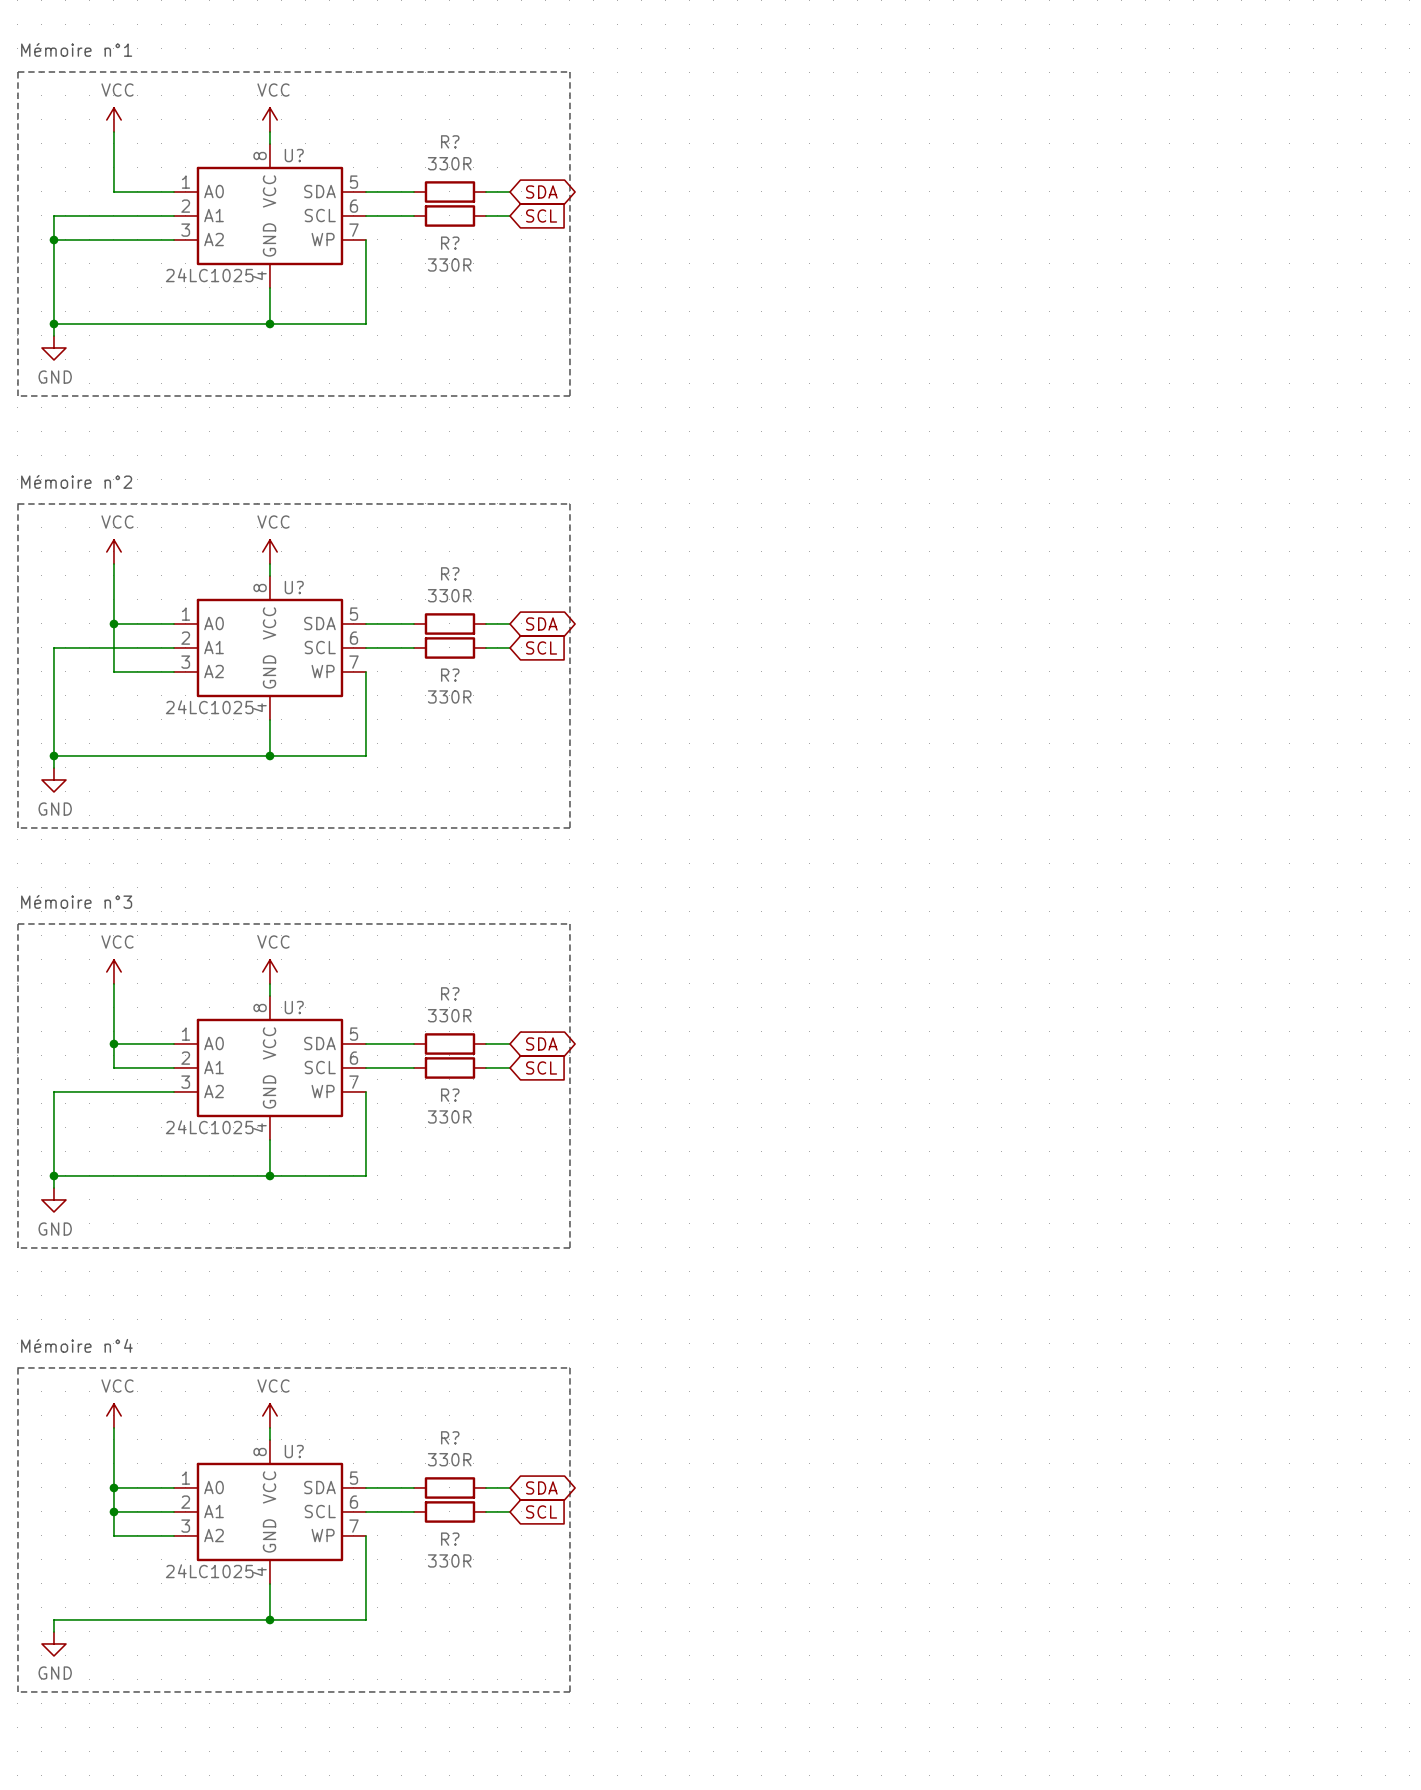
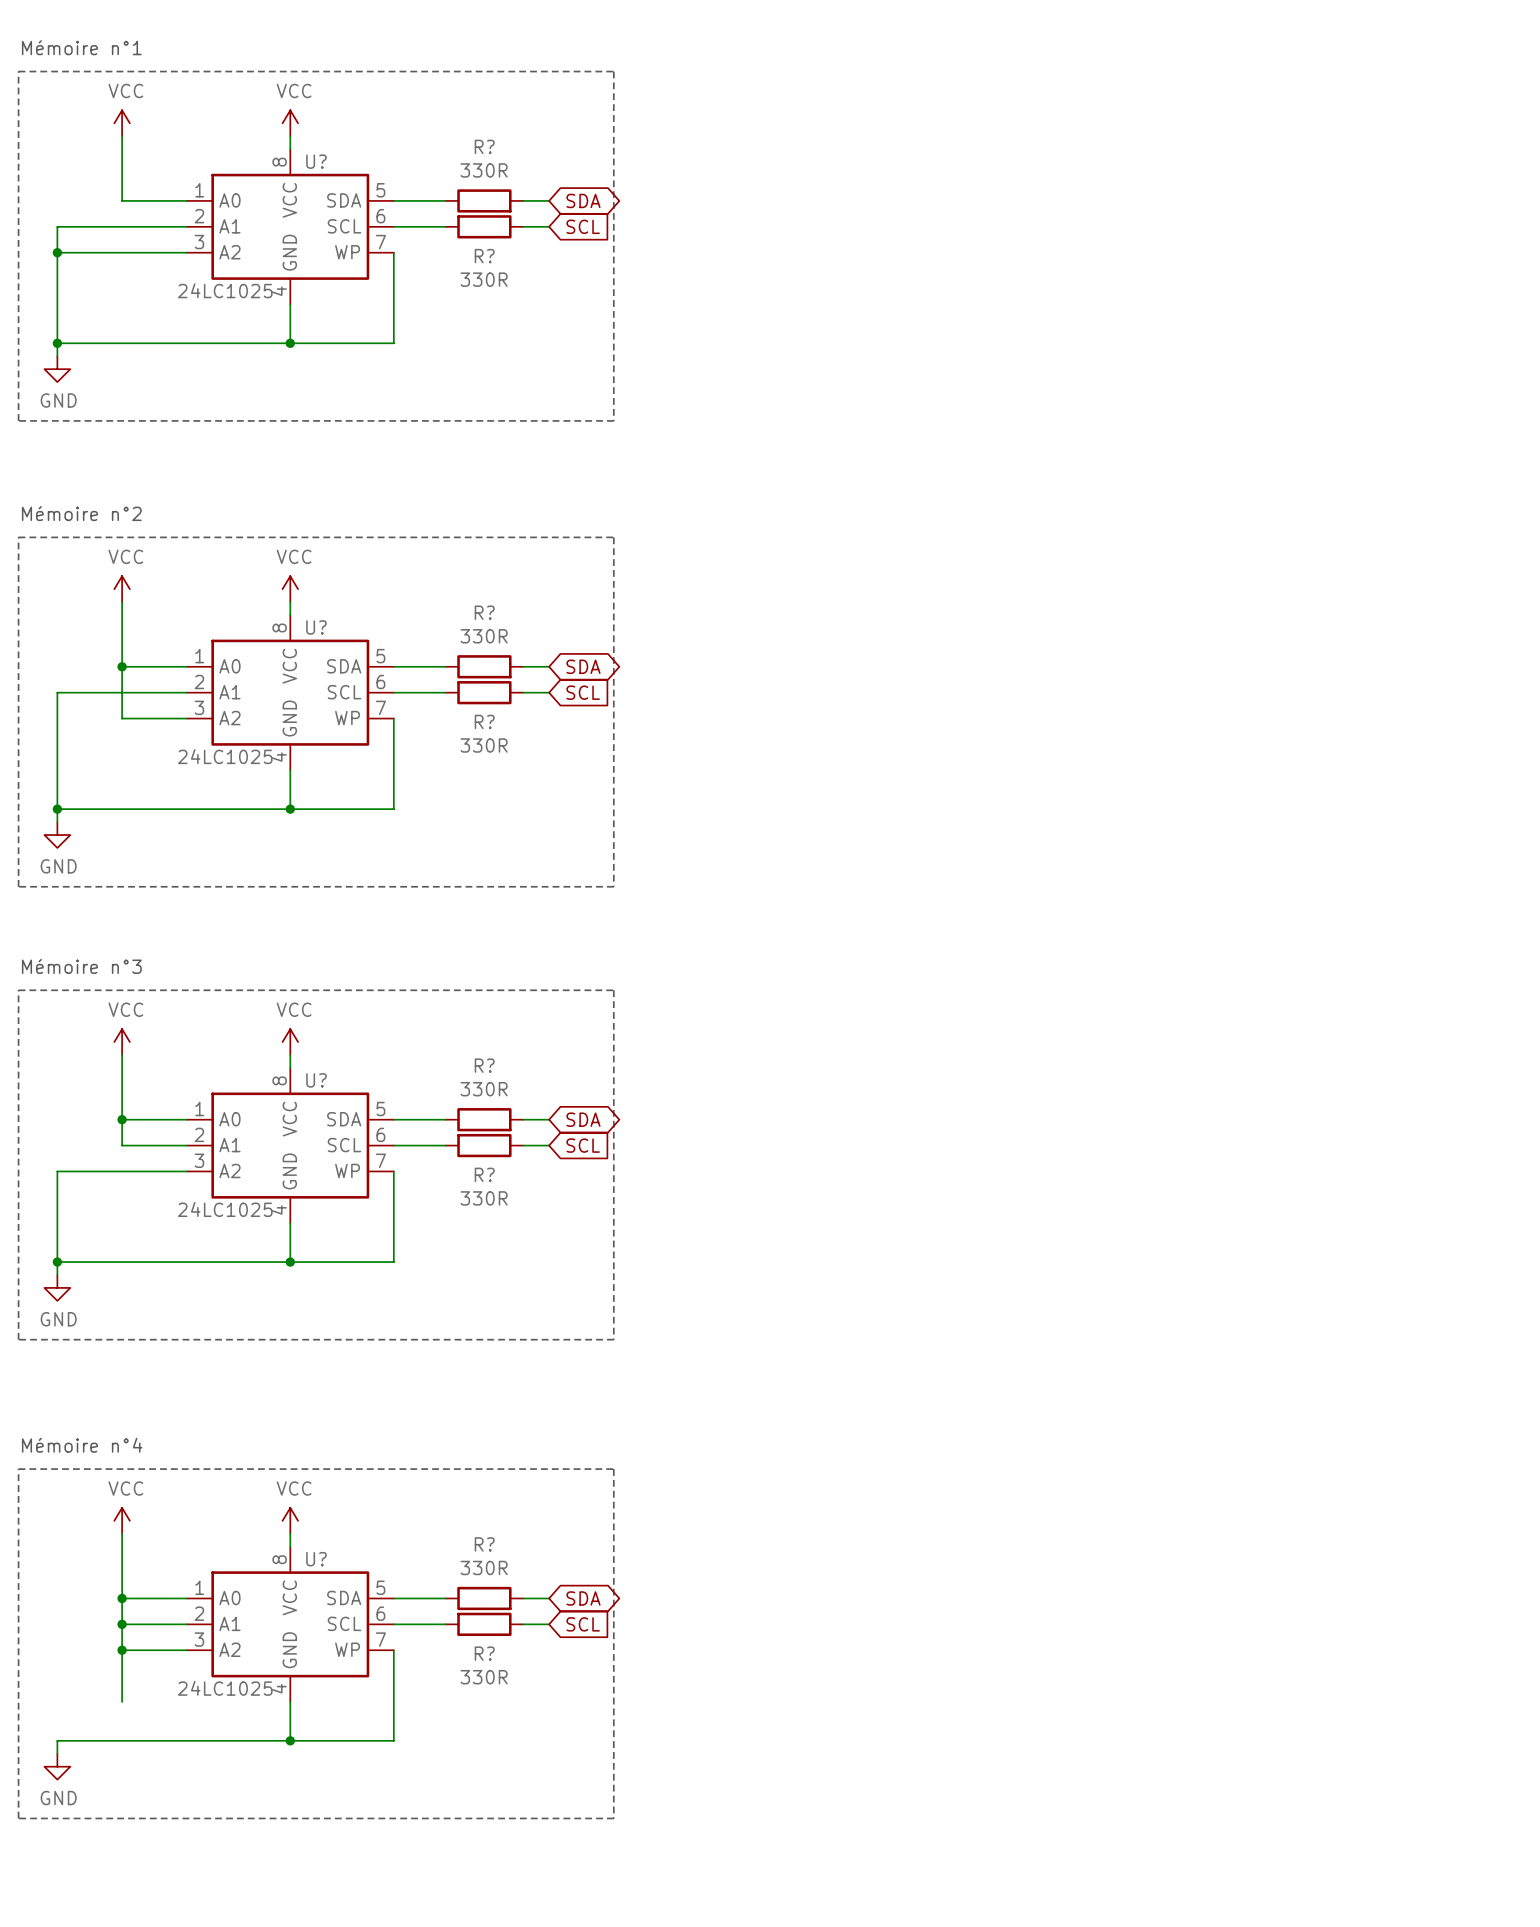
wire: none -> (122, 1650) (122, 1702)
junction: none -> (122, 1650)

